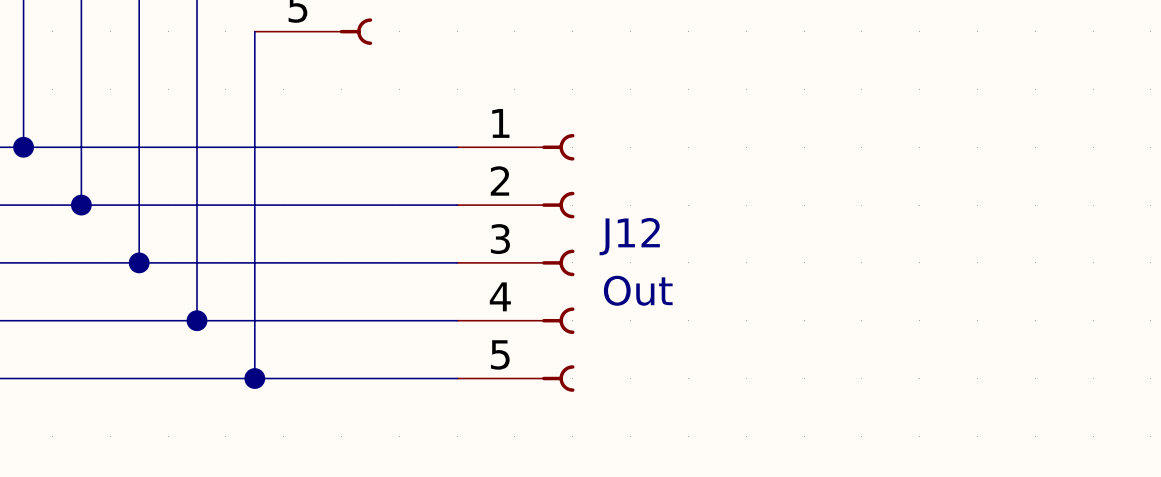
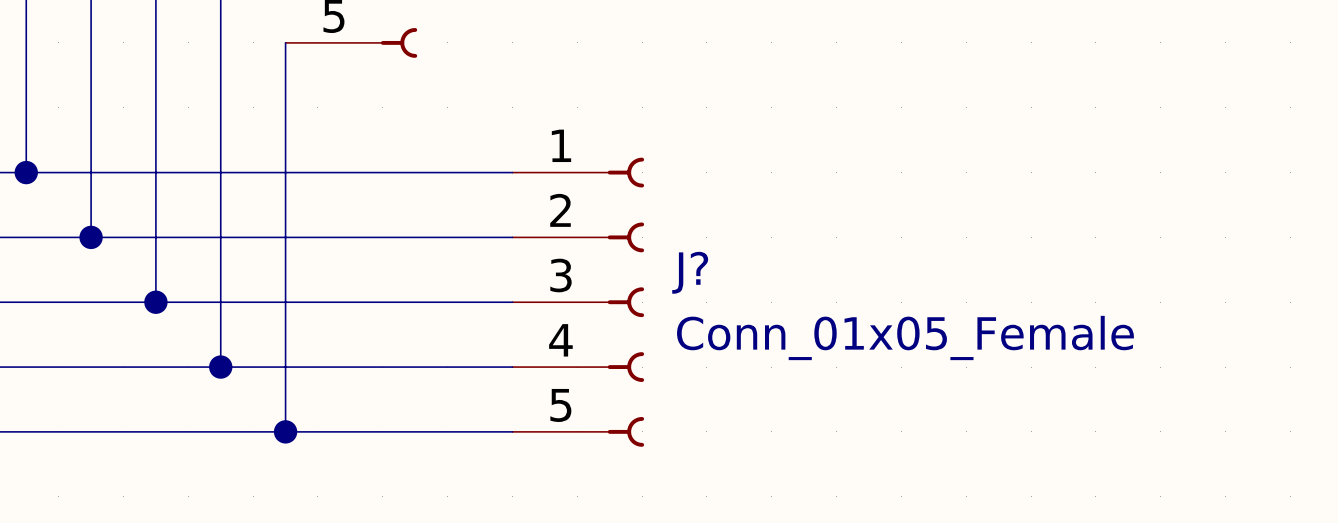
J12 name: J12 (629, 236) -> J? (690, 272)
J12 value: Out (638, 290) -> Conn_01x05_Female (905, 337)

